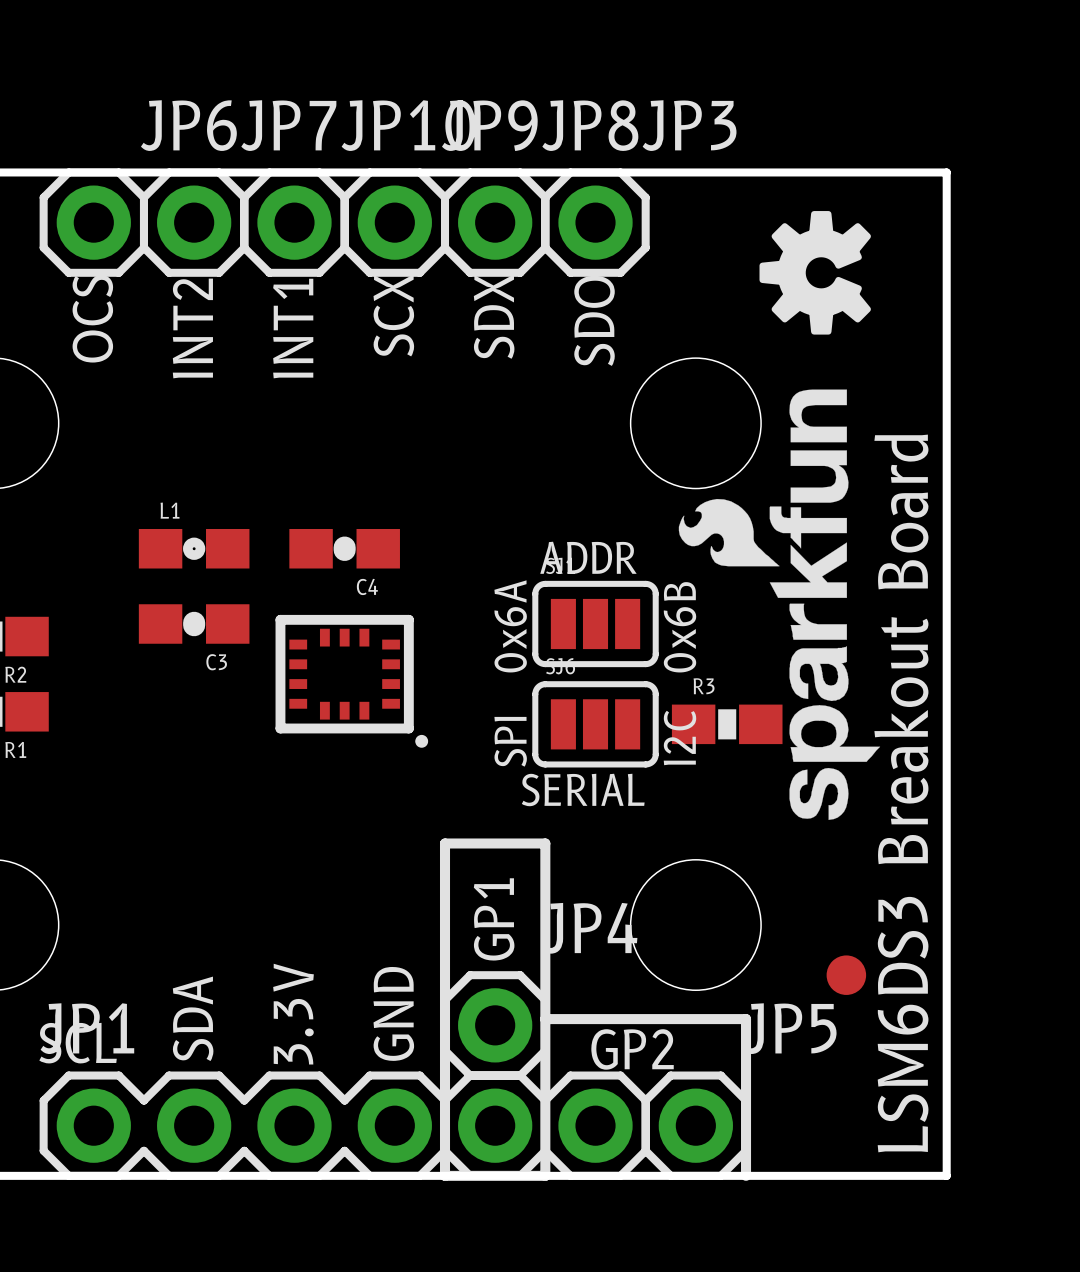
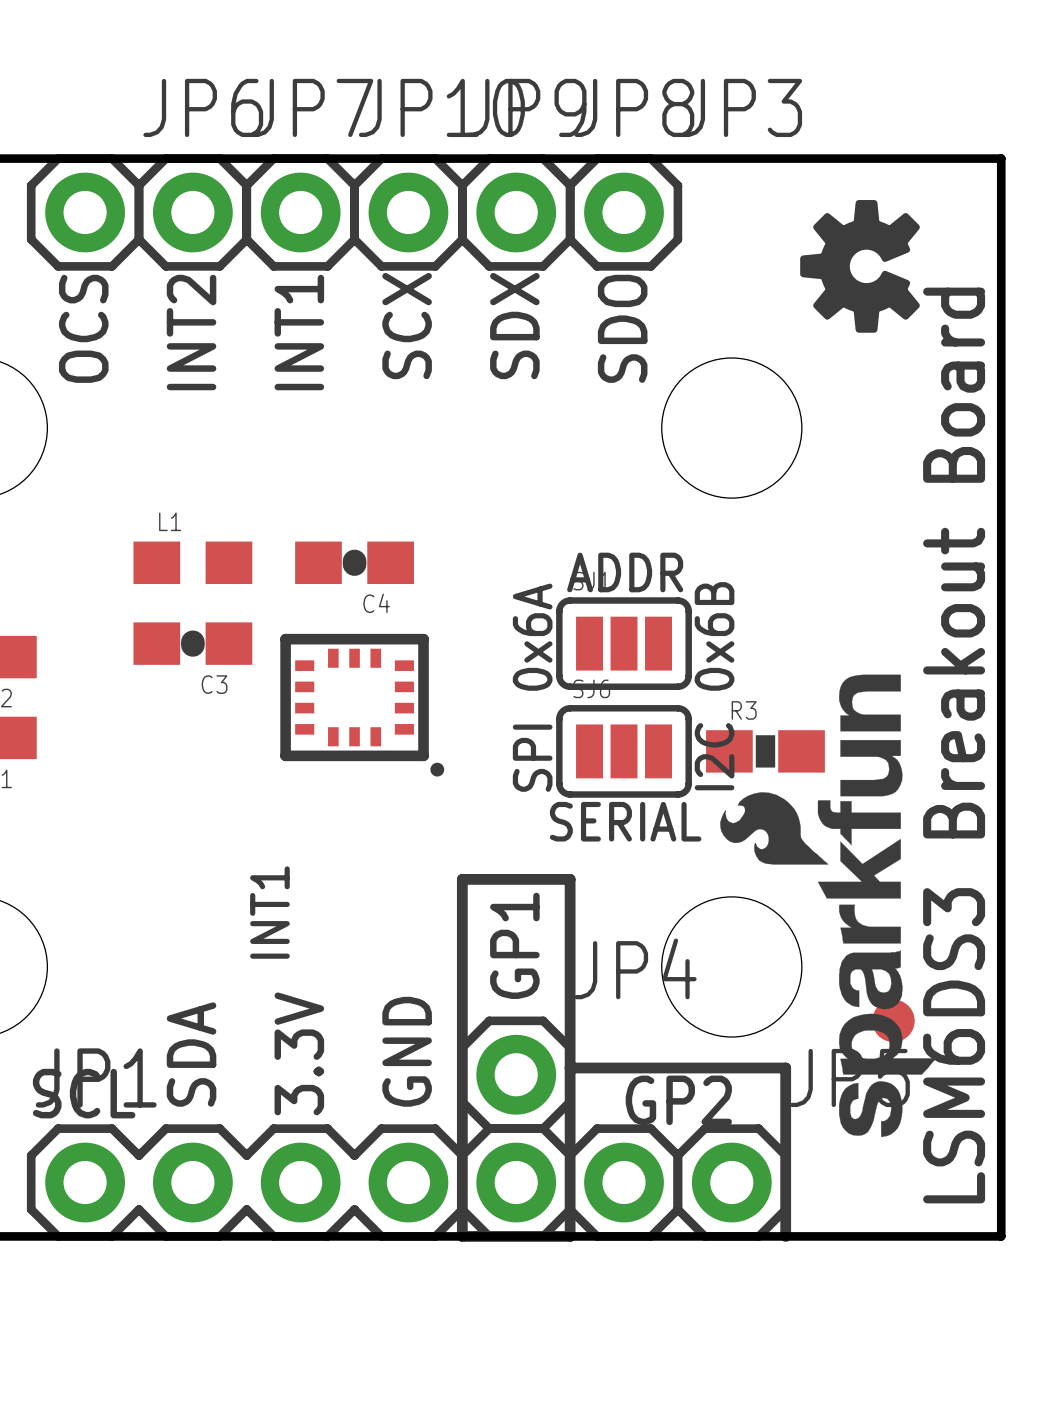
L1 footprint: [138, 528, 250, 569] -> [133, 541, 253, 584]
drawing position: (779, 604) -> (828, 905)
text: none -> INT1 (269, 912)

